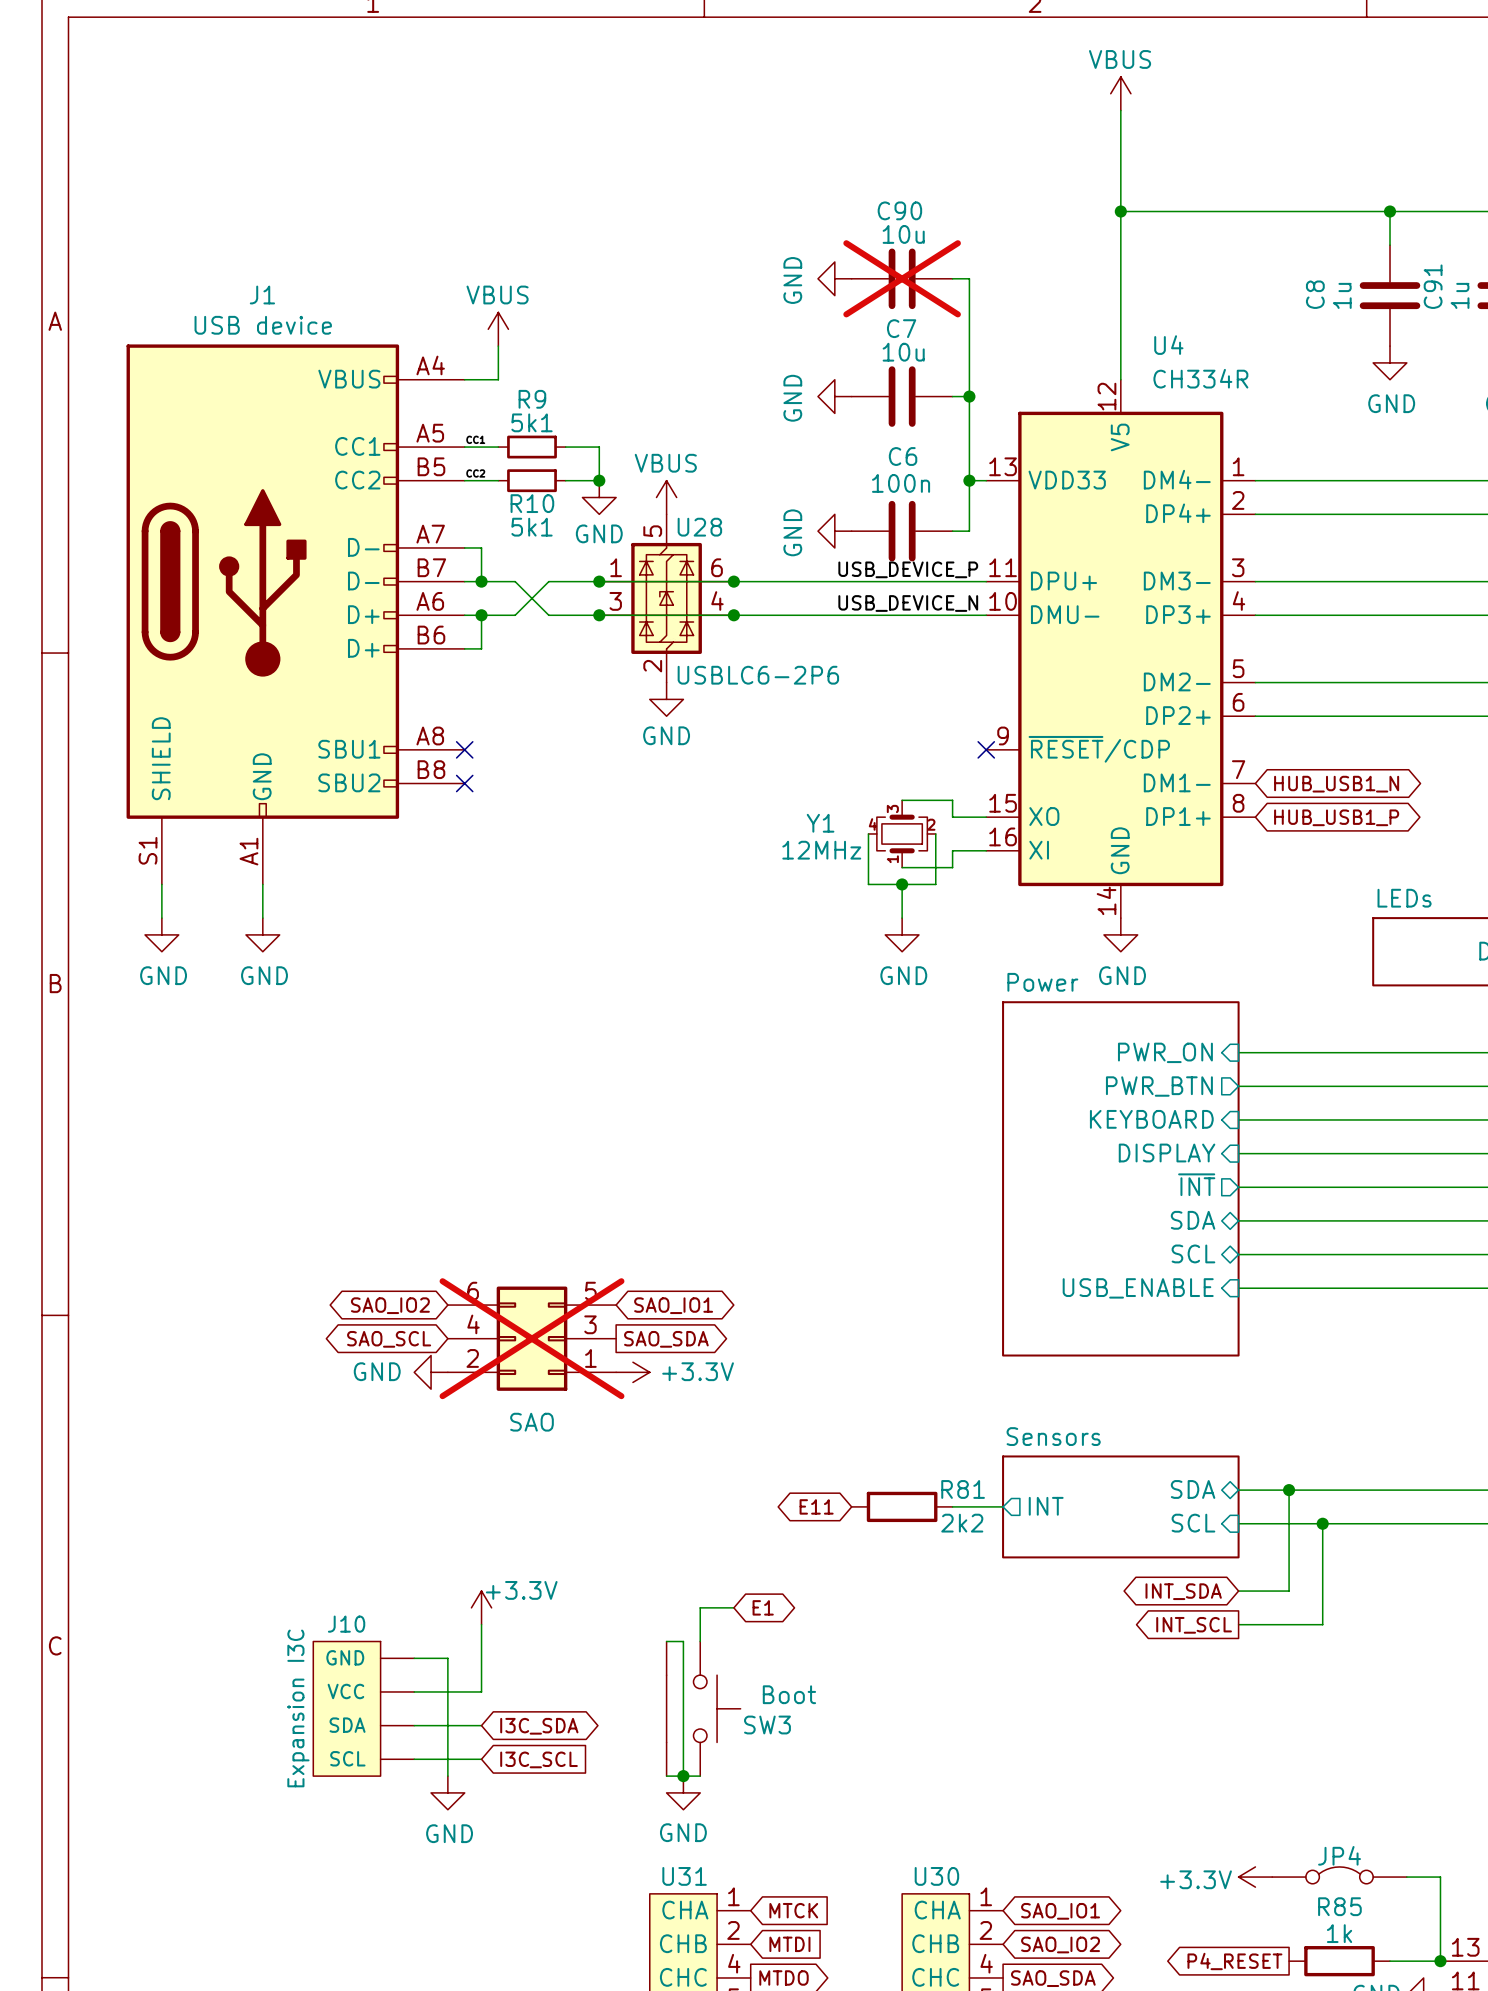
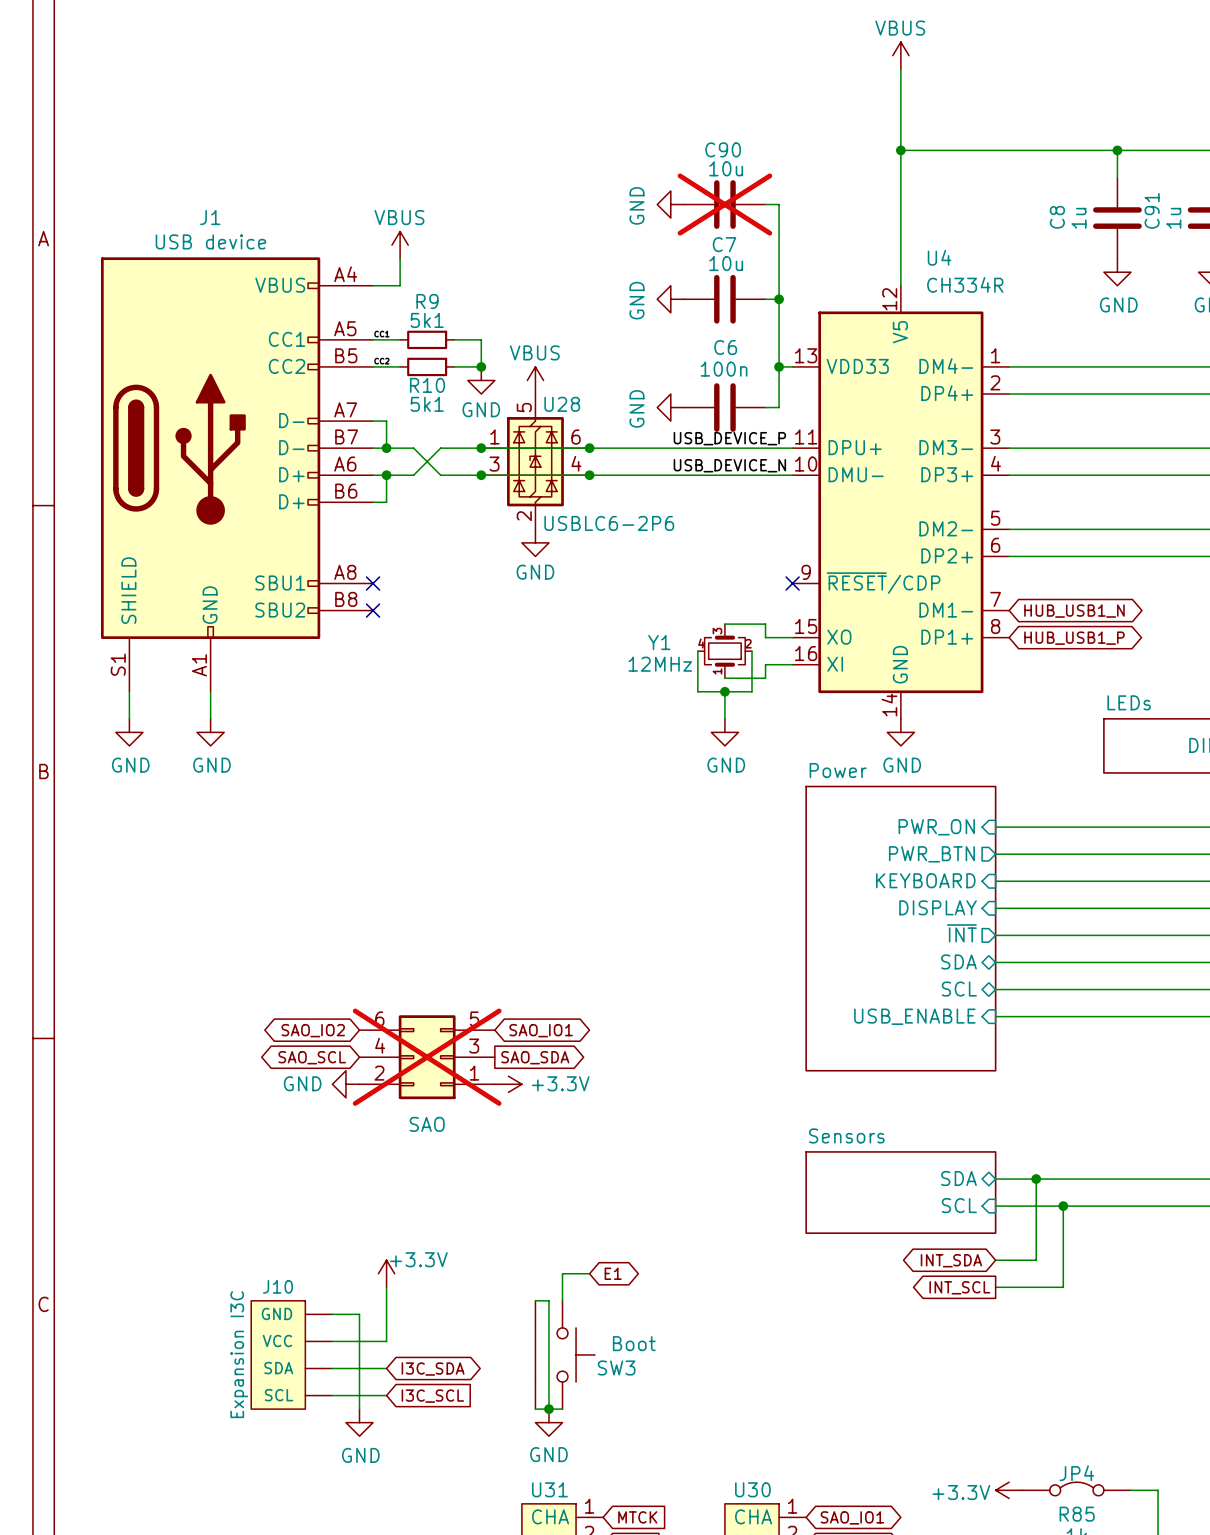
global label: E11 (816, 1506) -> none
R81: 2k2 (902, 1506) -> none
wire: (952, 1506) (1003, 1506) -> none
sheet pin: INT (1046, 1506) -> none

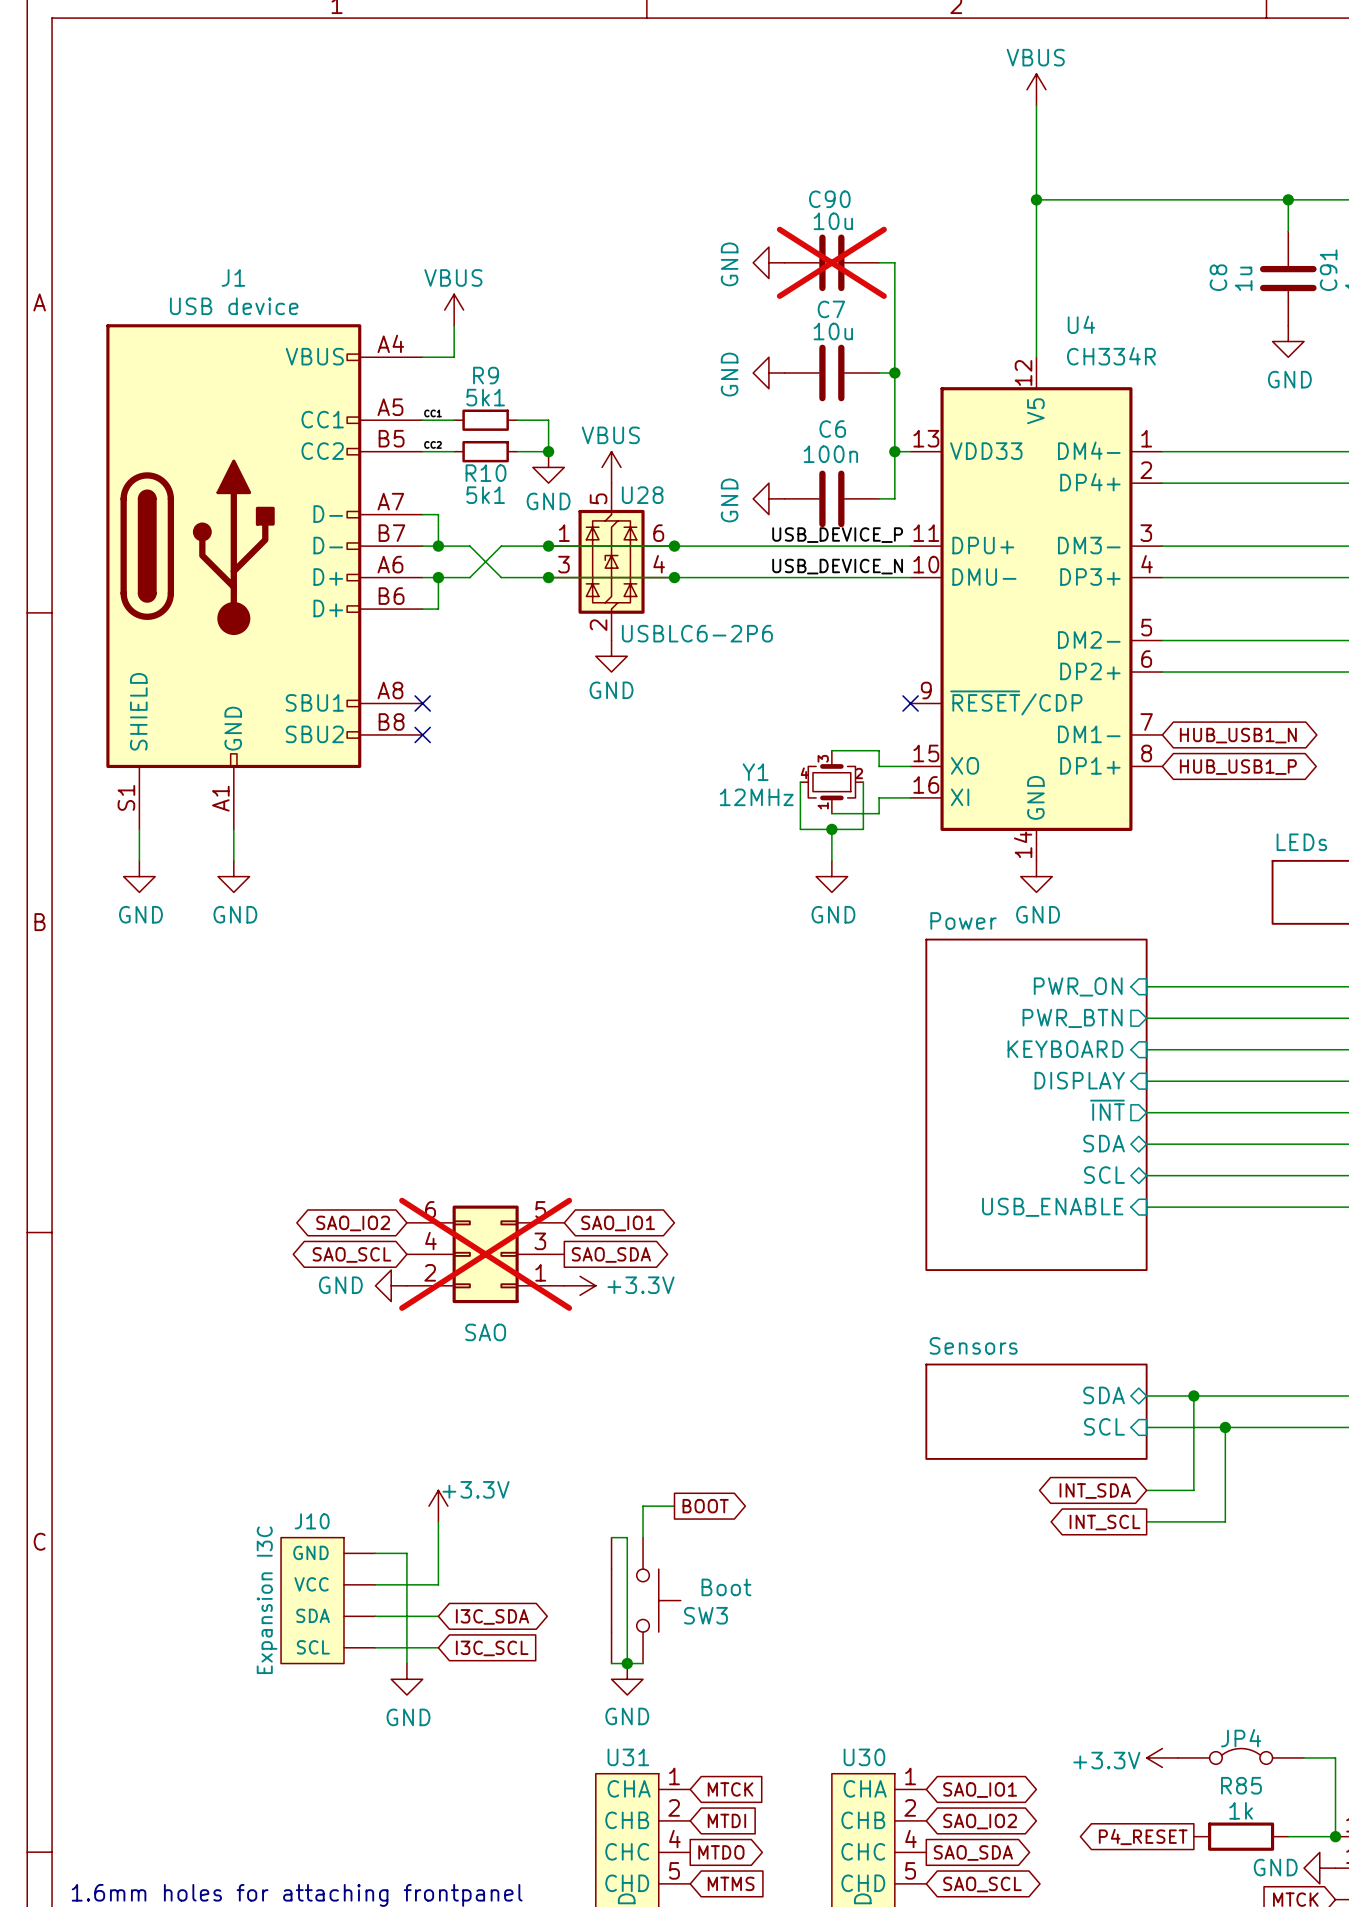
global label shape: bidirectional (613, 1273) -> output (705, 1506)
global label: E1 (613, 1273) -> BOOT (705, 1506)

